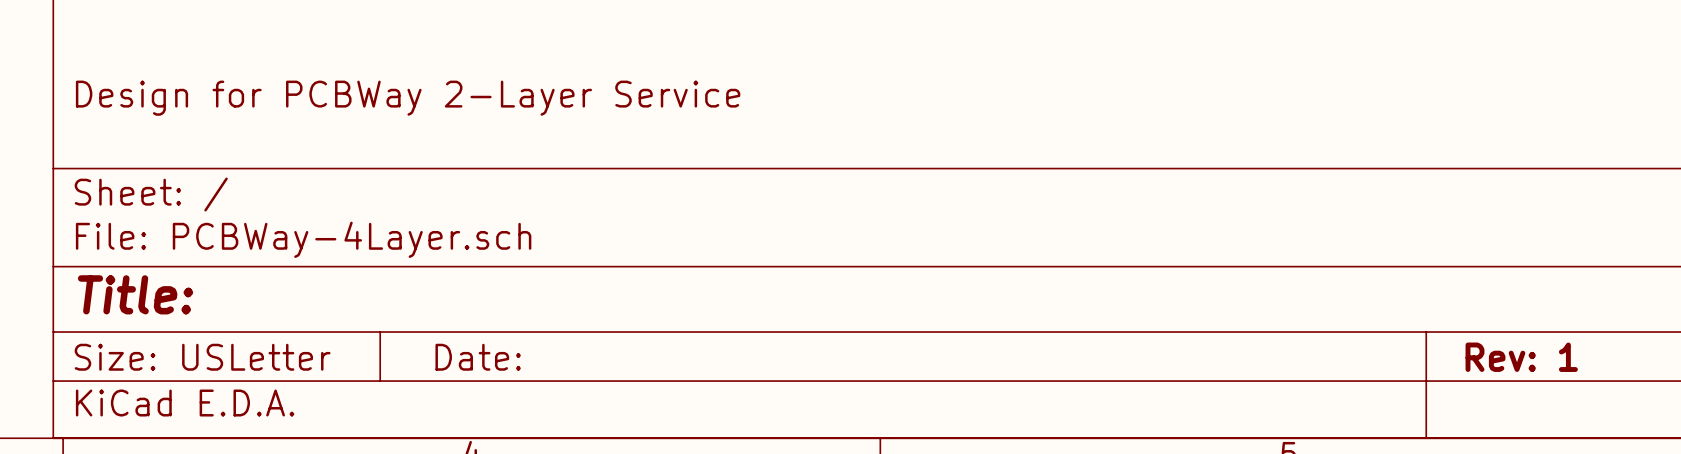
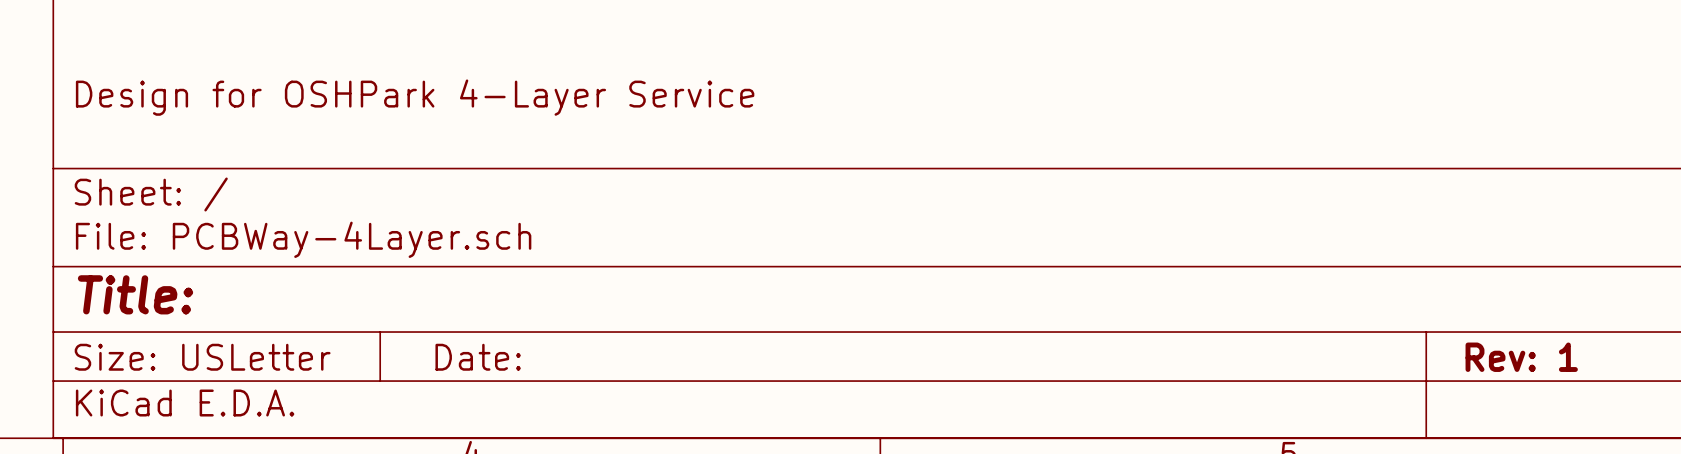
title block: Design for PCBWay 2-Layer Service (408, 98) -> Design for OSHPark 4-Layer Service (415, 97)

